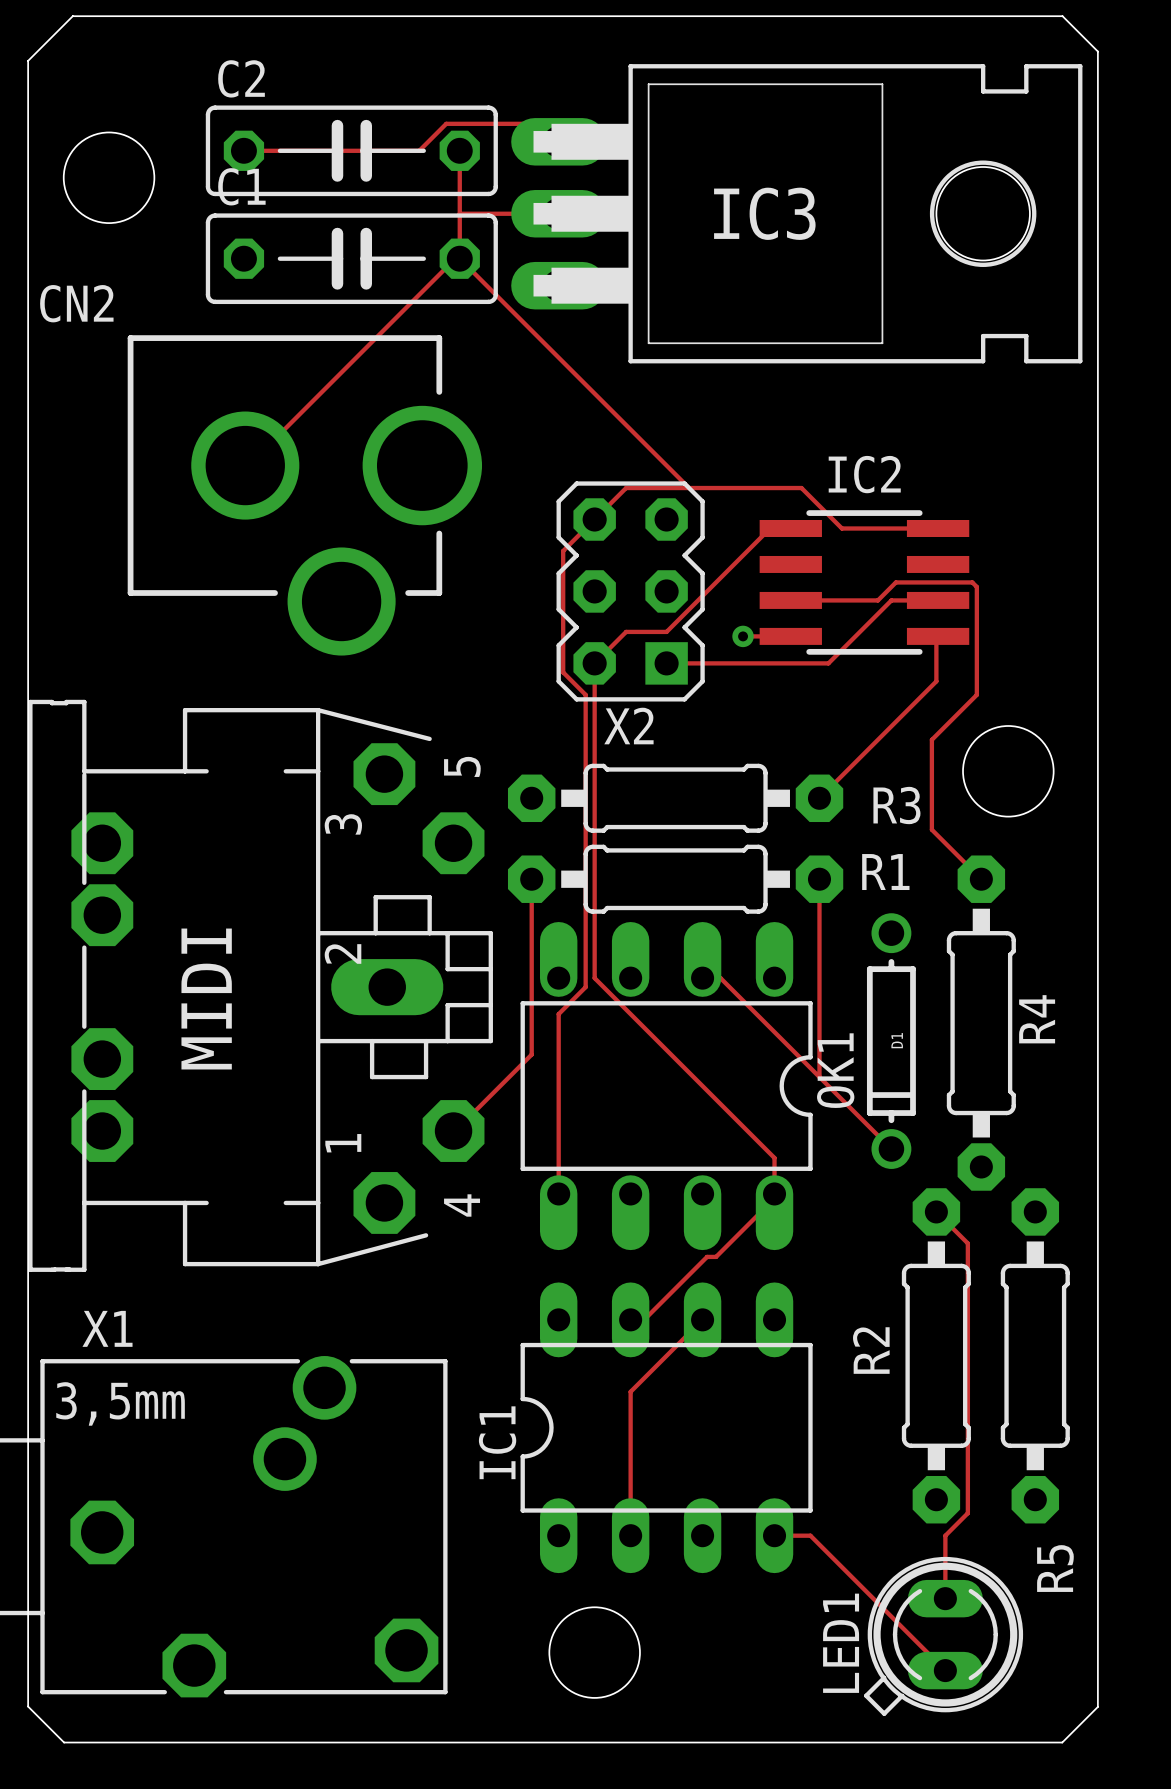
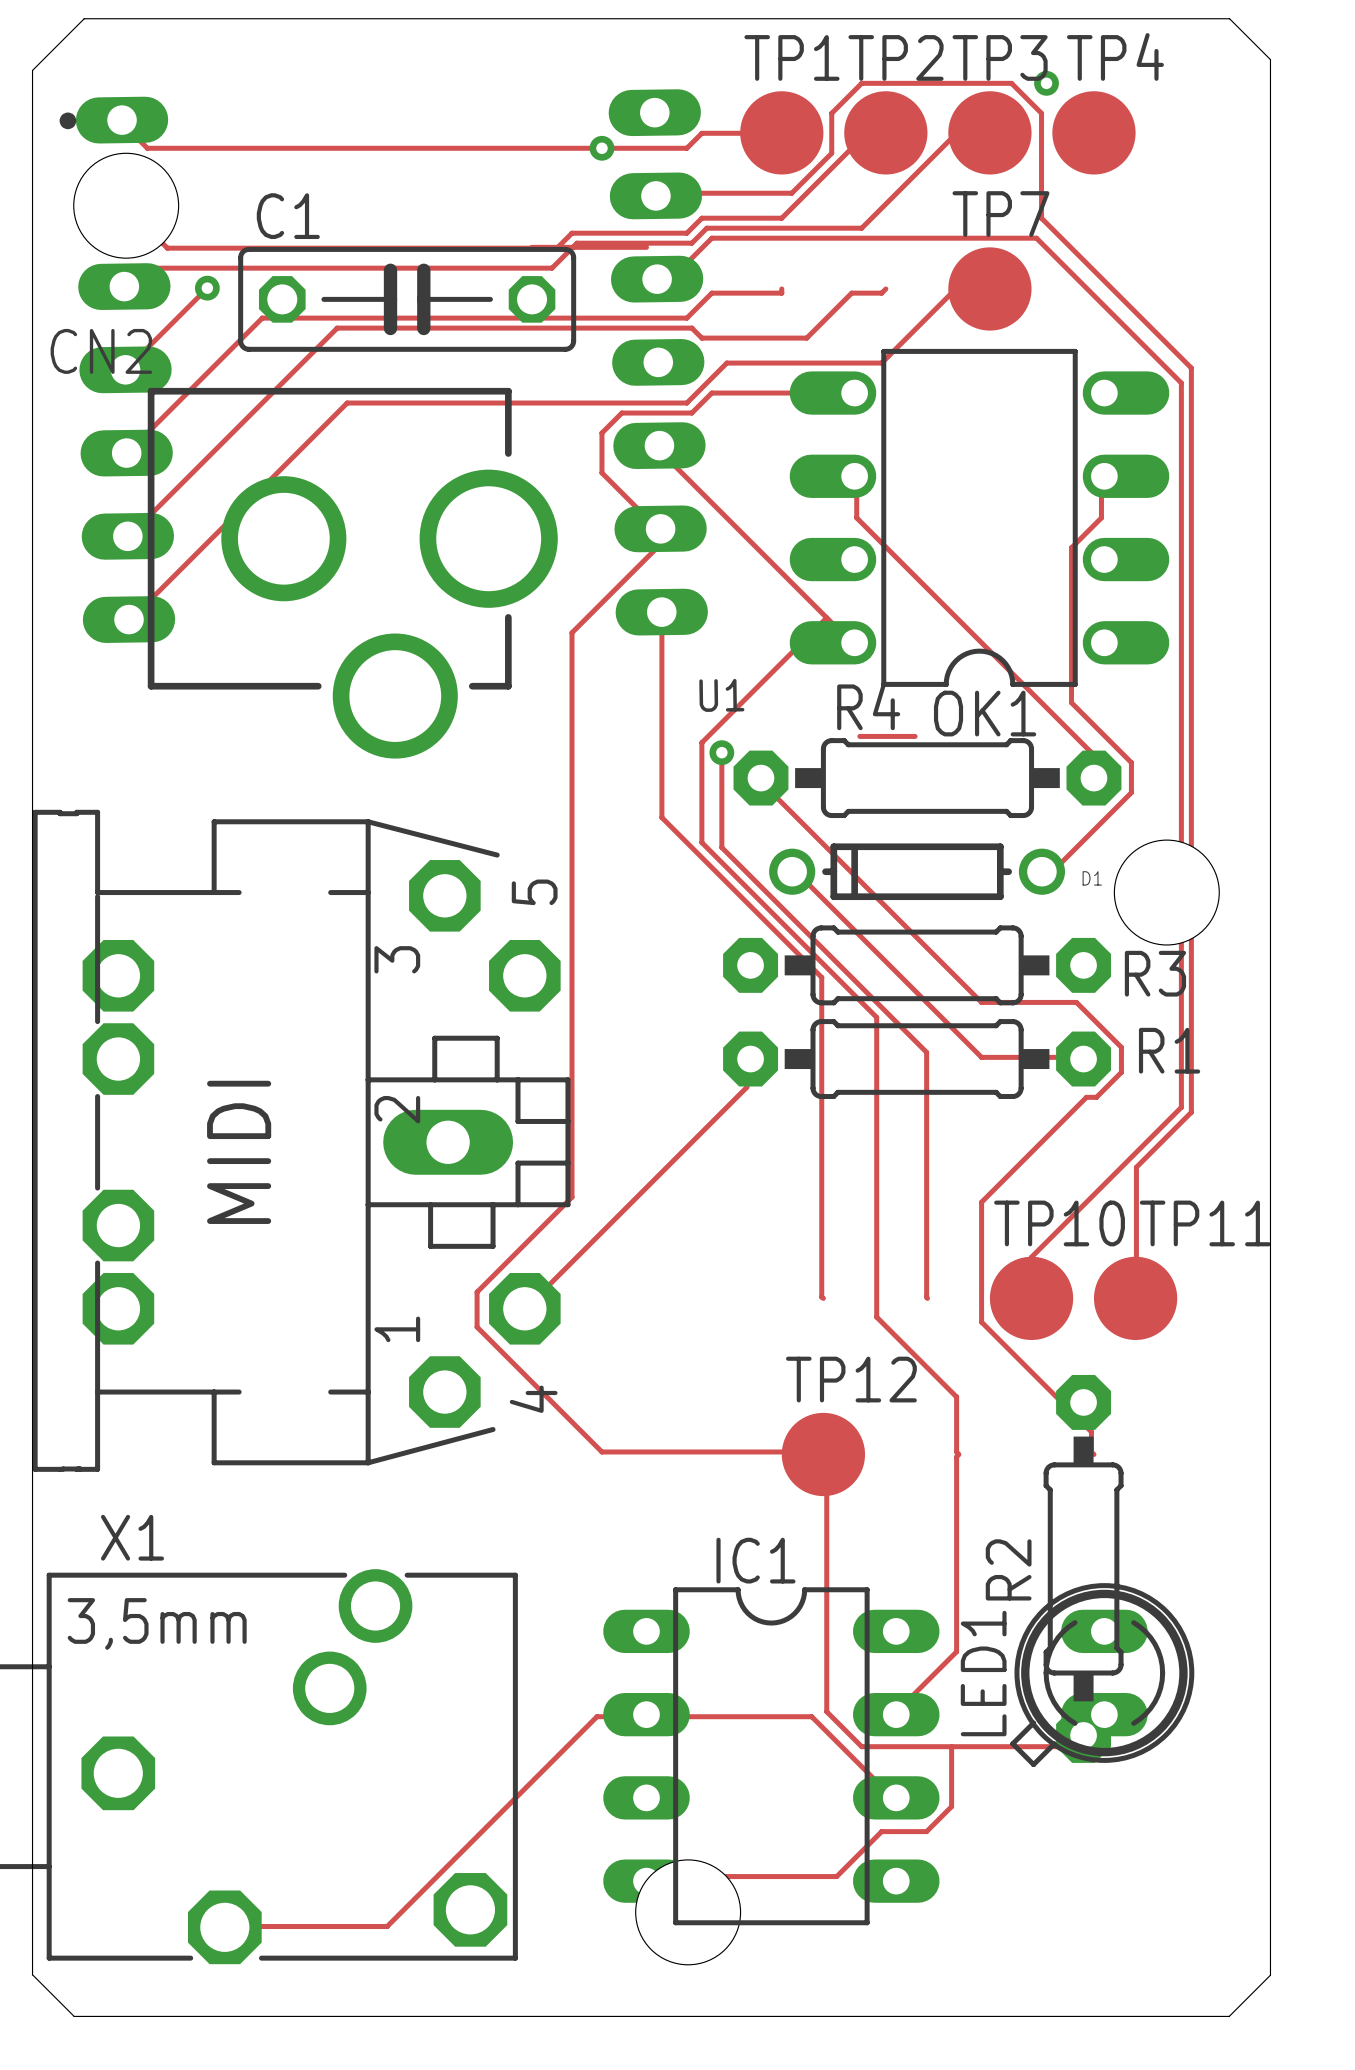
via: none -> (1046, 83)
track: none -> (122, 120) (122, 123) (147, 148) (686, 148) (701, 133) (781, 133)
TP1: none -> (781, 132)
track: none -> (885, 132) (866, 133) (781, 218) (701, 218) (686, 233) (571, 233) (557, 248) (167, 248) (123, 203)
TP2: none -> (885, 132)
track: none -> (989, 132) (956, 133) (861, 228) (706, 228) (691, 243) (576, 243) (552, 268) (142, 268) (124, 286)
TP3: none -> (989, 132)
TP4: none -> (1093, 132)
via: none -> (601, 148)
track: (558, 141) (540, 123) (446, 123) (419, 150) (243, 150) -> none
C2: (351, 150) -> none
track: (459, 150) (459, 258) (689, 488) -> none
track: none -> (655, 195) (656, 193) (791, 193) (831, 153) (831, 113) (861, 83) (1011, 83) (1041, 113) (1041, 218) (1191, 368) (1191, 1112) (1136, 1167) (1135, 1298)
IC3: (796, 213) -> none
track: none -> (657, 279) (671, 278) (711, 238) (1036, 238) (1181, 383) (1181, 1107) (1031, 1257) (1031, 1298)
track: none -> (207, 288) (125, 369)
via: none -> (207, 288)
track: none -> (781, 288) (781, 293) (711, 293) (686, 318) (262, 318) (126, 453)
track: none -> (885, 288) (881, 293) (851, 293) (806, 338) (701, 338) (691, 328) (337, 328) (127, 536)
track: none -> (989, 288) (986, 293) (951, 293) (881, 363) (726, 363) (686, 403) (347, 403) (129, 619)
TP7: none -> (989, 288)
track: (459, 254) (246, 467) (245, 465) -> none
U1: none -> (383, 366)
track: none -> (854, 393) (711, 393) (691, 413) (621, 413) (601, 433) (601, 472) (656, 527) (660, 528) (656, 532) (656, 547) (571, 632) (571, 1197) (477, 1292) (477, 1327) (601, 1451) (821, 1451) (826, 1456) (826, 1711) (861, 1746) (1071, 1746) (1104, 1714)
track: none -> (659, 445) (656, 447) (851, 642) (854, 642)
track: none -> (854, 476) (856, 477) (856, 517) (1091, 752) (1091, 777) (1093, 778)
track: none -> (1104, 476) (1101, 477) (1101, 517) (1071, 547) (1071, 702) (1131, 762) (1131, 792) (1056, 867) (1046, 867) (1041, 871)
track: none -> (661, 612) (661, 817) (821, 977) (821, 1297) (823, 1298)
track: (790, 528) (770, 528) (666, 631) (626, 631) (594, 663) (594, 978) (774, 1157) (774, 1198) (716, 1256) (707, 1256) (644, 1319) (630, 1319) -> none
track: (938, 528) (841, 528) (801, 488) (626, 488) (563, 550) (563, 672) (585, 694) (585, 987) (558, 1014) (558, 1193) -> none
track: none -> (826, 617) (701, 742) (701, 842) (876, 1017) (876, 1317) (956, 1397) (956, 1451) (958, 1454) (956, 1456) (956, 1651) (896, 1711) (896, 1714)
IC2: (864, 582) -> none
X2: (630, 591) -> none
track: (790, 600) (877, 600) (895, 582) (972, 582) (976, 586) (976, 694) (931, 739) (931, 829) (981, 879) -> none
track: (938, 600) (891, 600) (828, 663) (666, 663) -> none
via position: (743, 636) -> (721, 752)
track: (938, 636) (936, 636) (936, 681) (819, 798) -> none
track: none -> (721, 752) (721, 847) (926, 1052) (927, 1298)
track: none -> (760, 778) (761, 782) (981, 1002) (1076, 1002) (1121, 1047) (1121, 1072) (1096, 1097) (1086, 1097) (981, 1202) (981, 1322) (1091, 1432) (1091, 1451) (1093, 1454)
track: none -> (792, 871) (796, 872) (981, 1057) (1081, 1057) (1083, 1059)
R3 position: (675, 798) -> (917, 965)
R3 name position: R3 (896, 805) -> R3 (1155, 973)
track: (531, 879) (531, 1054) (453, 1131) -> (750, 1059) (746, 1062) (746, 1087) (524, 1308)
R1 position: (675, 879) -> (917, 1059)
track: (819, 879) (819, 1077) -> none
track: (702, 978) (720, 978) (891, 1149) -> none
R4 name position: R4 (1037, 1019) -> R4 (868, 706)
R4 rotation: 0° (981, 1023) -> 90° clockwise (927, 778)
R4 position: (981, 1023) -> (927, 778)
D1 name position: D1 (897, 1040) -> D1 (1092, 878)
D1 rotation: 0° (891, 1041) -> 90° clockwise (917, 871)
D1 position: (891, 1041) -> (917, 871)
OK1 rotation: 0° (666, 1086) -> 90° clockwise (979, 517)
OK1 position: (666, 1086) -> (979, 517)
TP10: none -> (1031, 1298)
TP11: none -> (1135, 1298)
track: (936, 1211) (967, 1243) (967, 1513) (945, 1535) (945, 1598) -> none
TP12: none -> (823, 1454)
track: (702, 1319) (630, 1391) (630, 1535) -> none
R5: (1035, 1355) -> none
IC1 rotation: 0° (666, 1427) -> 90° clockwise (771, 1756)
track: none -> (951, 1746) (951, 1806) (926, 1831) (881, 1831) (836, 1876) (646, 1876) (646, 1881)
track: (774, 1535) (810, 1535) (945, 1670) -> none
track: none -> (896, 1797) (891, 1796) (811, 1716) (646, 1716) (646, 1714) (641, 1716) (596, 1716) (387, 1926) (224, 1927)
LED1 position: (943, 1636) -> (1102, 1675)

